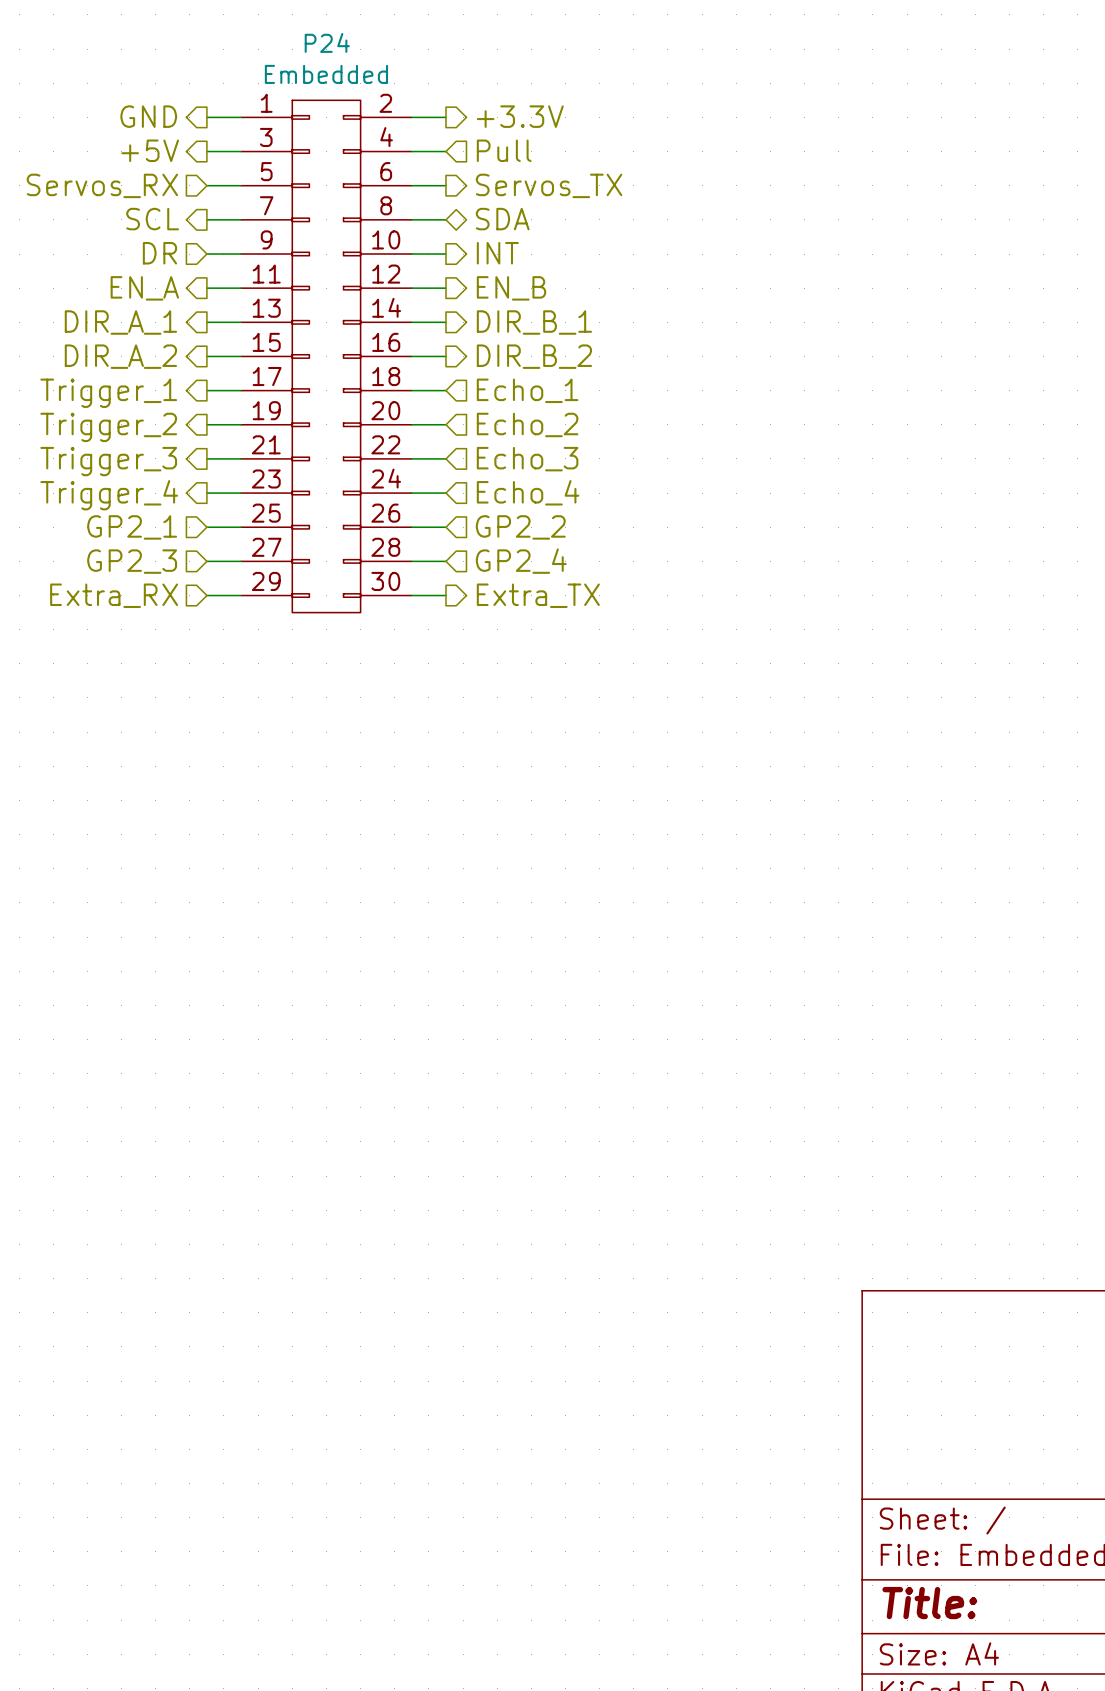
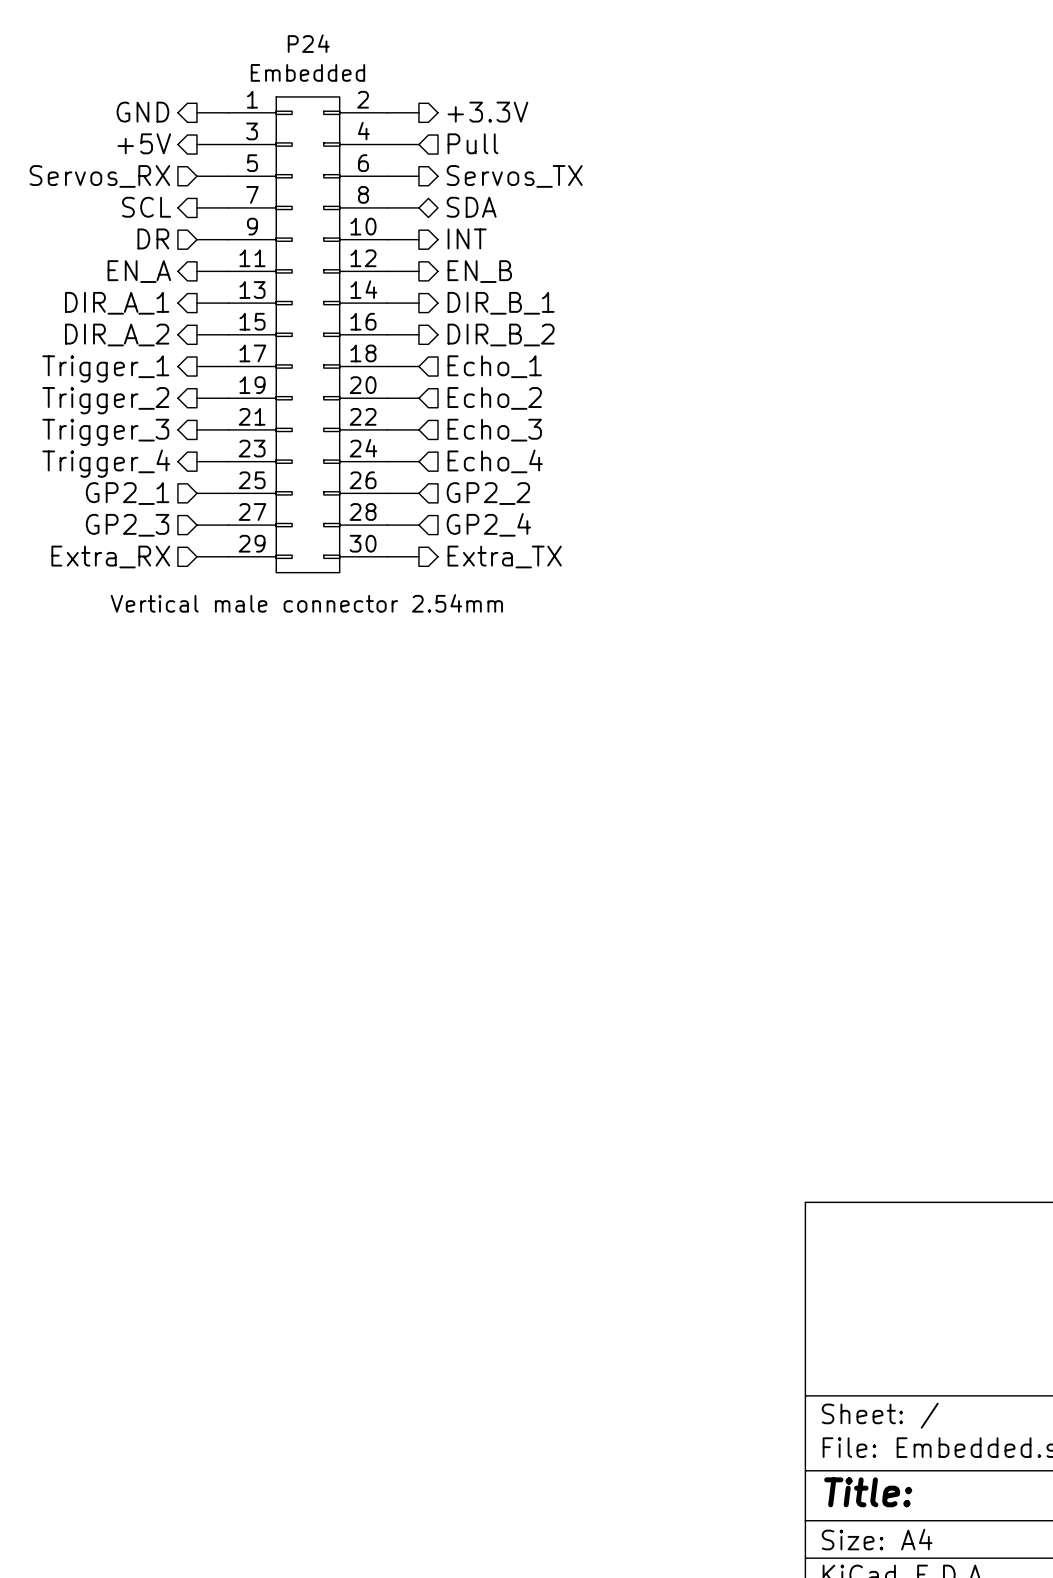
P24 text: none -> Vertical male connector 2.54mm (306, 603)

